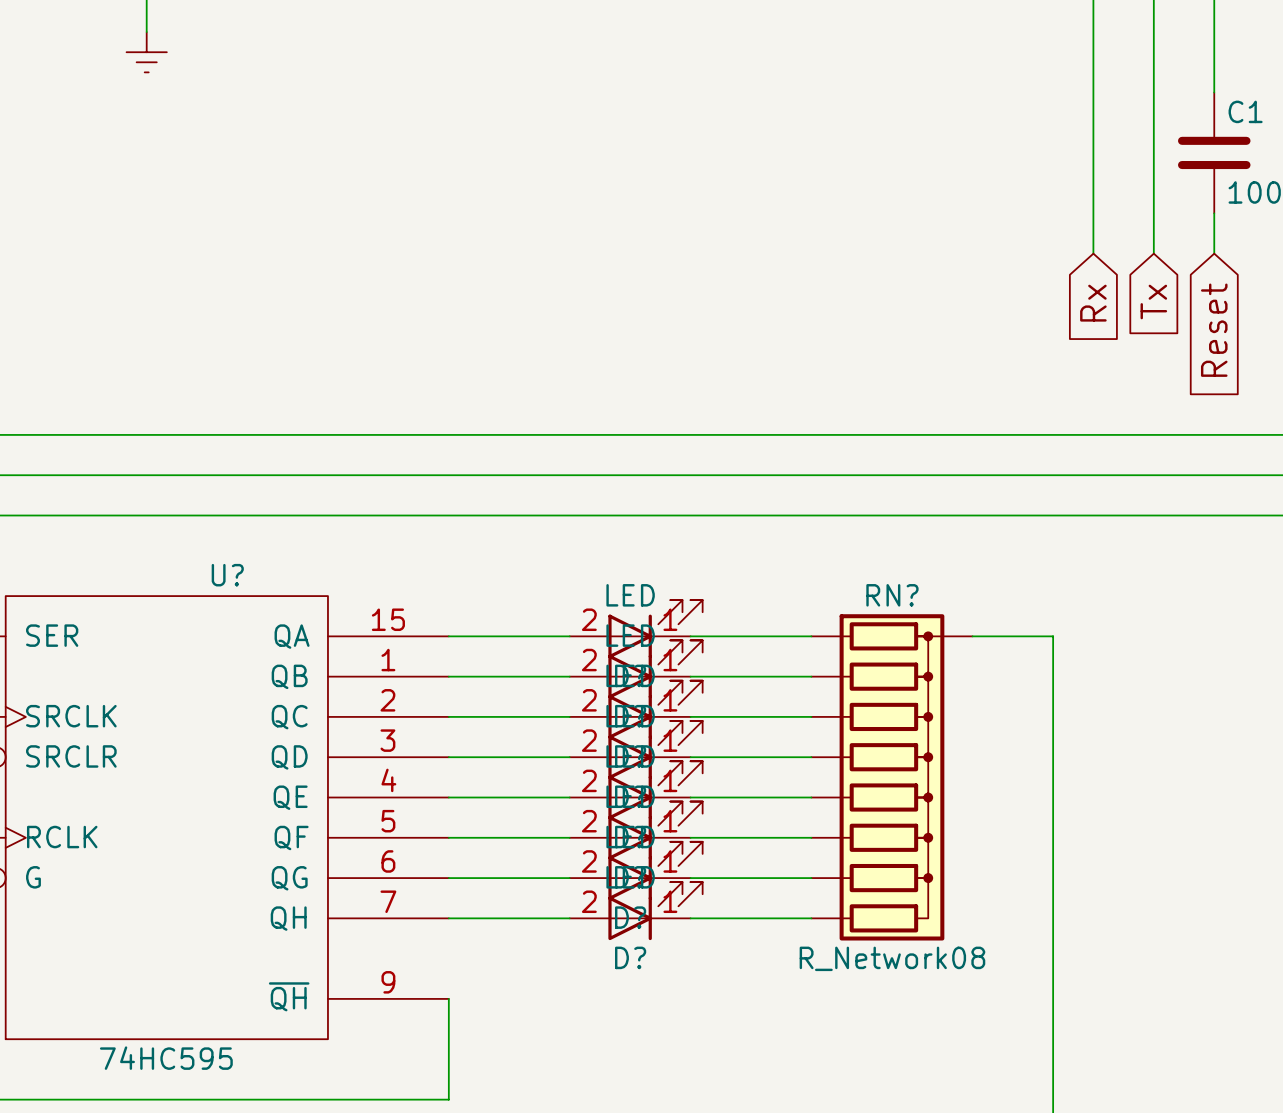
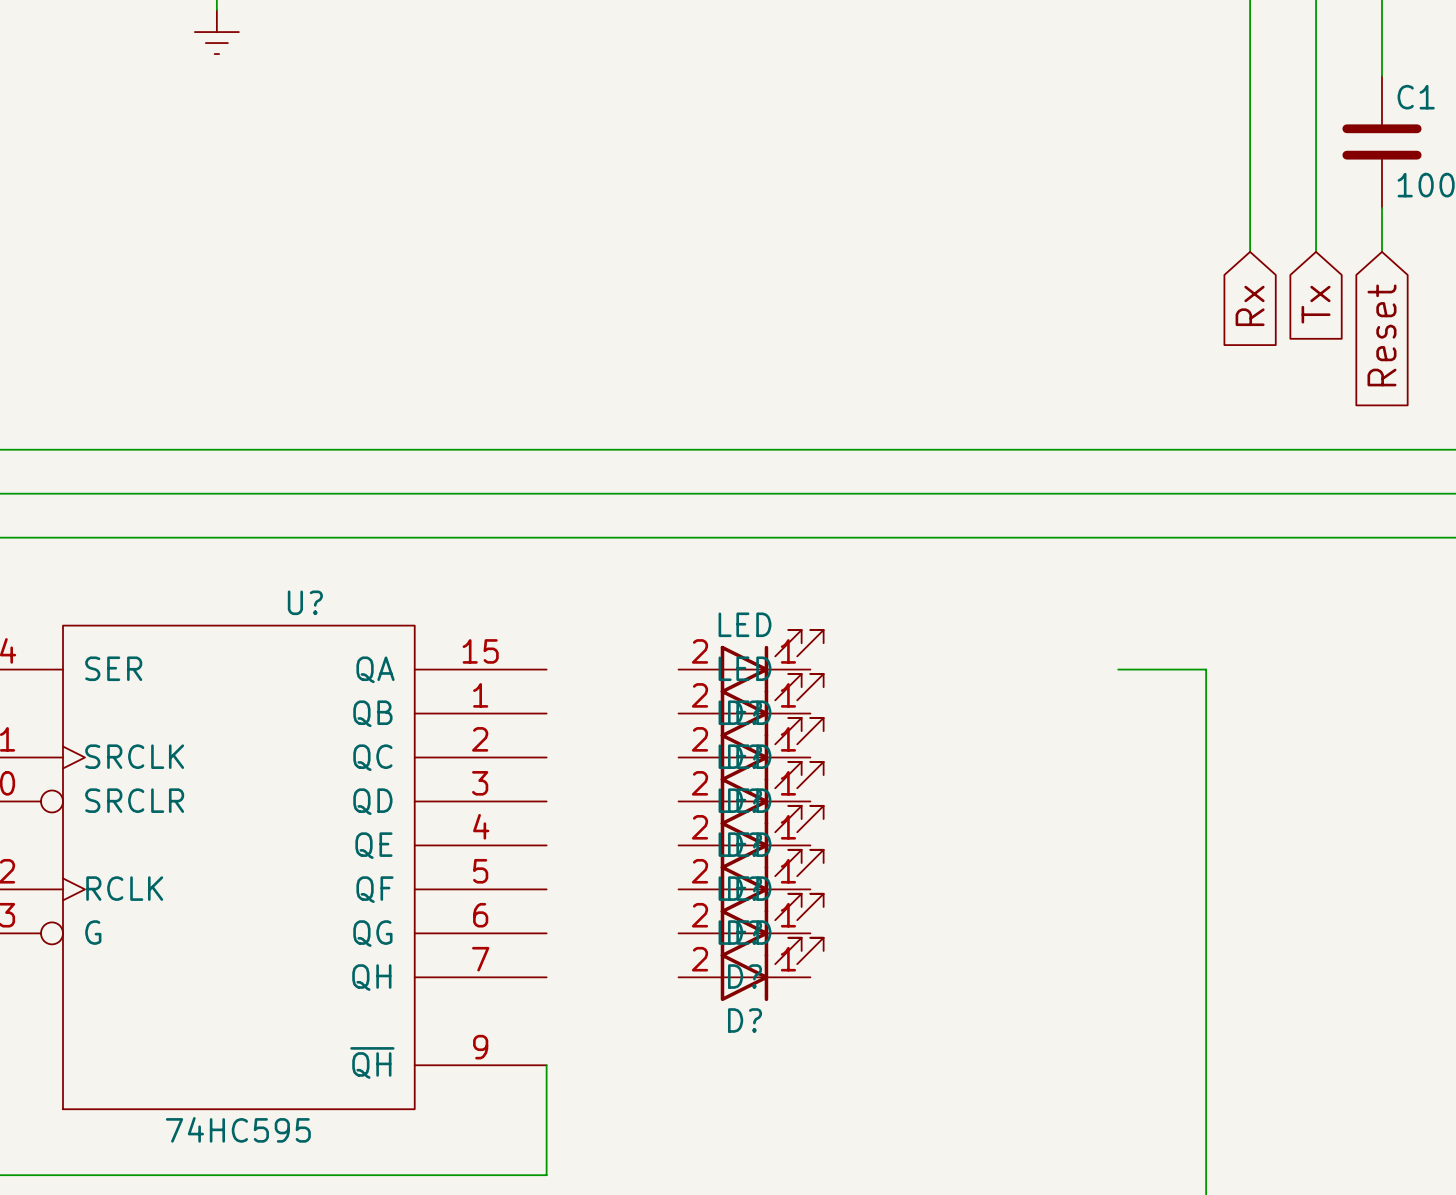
wire: (448, 636) (569, 636) -> none
wire: (690, 636) (811, 636) -> none
wire: (448, 676) (569, 676) -> none
wire: (690, 676) (811, 676) -> none
wire: (448, 716) (569, 716) -> none
wire: (690, 716) (811, 716) -> none
wire: (448, 757) (569, 757) -> none
wire: (690, 757) (811, 757) -> none
RN?: R_Network08 (891, 777) -> none
wire: (448, 797) (569, 797) -> none
wire: (690, 797) (811, 797) -> none
wire: (448, 837) (569, 837) -> none
wire: (690, 837) (811, 837) -> none
wire: (448, 878) (569, 878) -> none
wire: (690, 878) (811, 878) -> none
wire: (448, 918) (569, 918) -> none
wire: (690, 918) (811, 918) -> none

